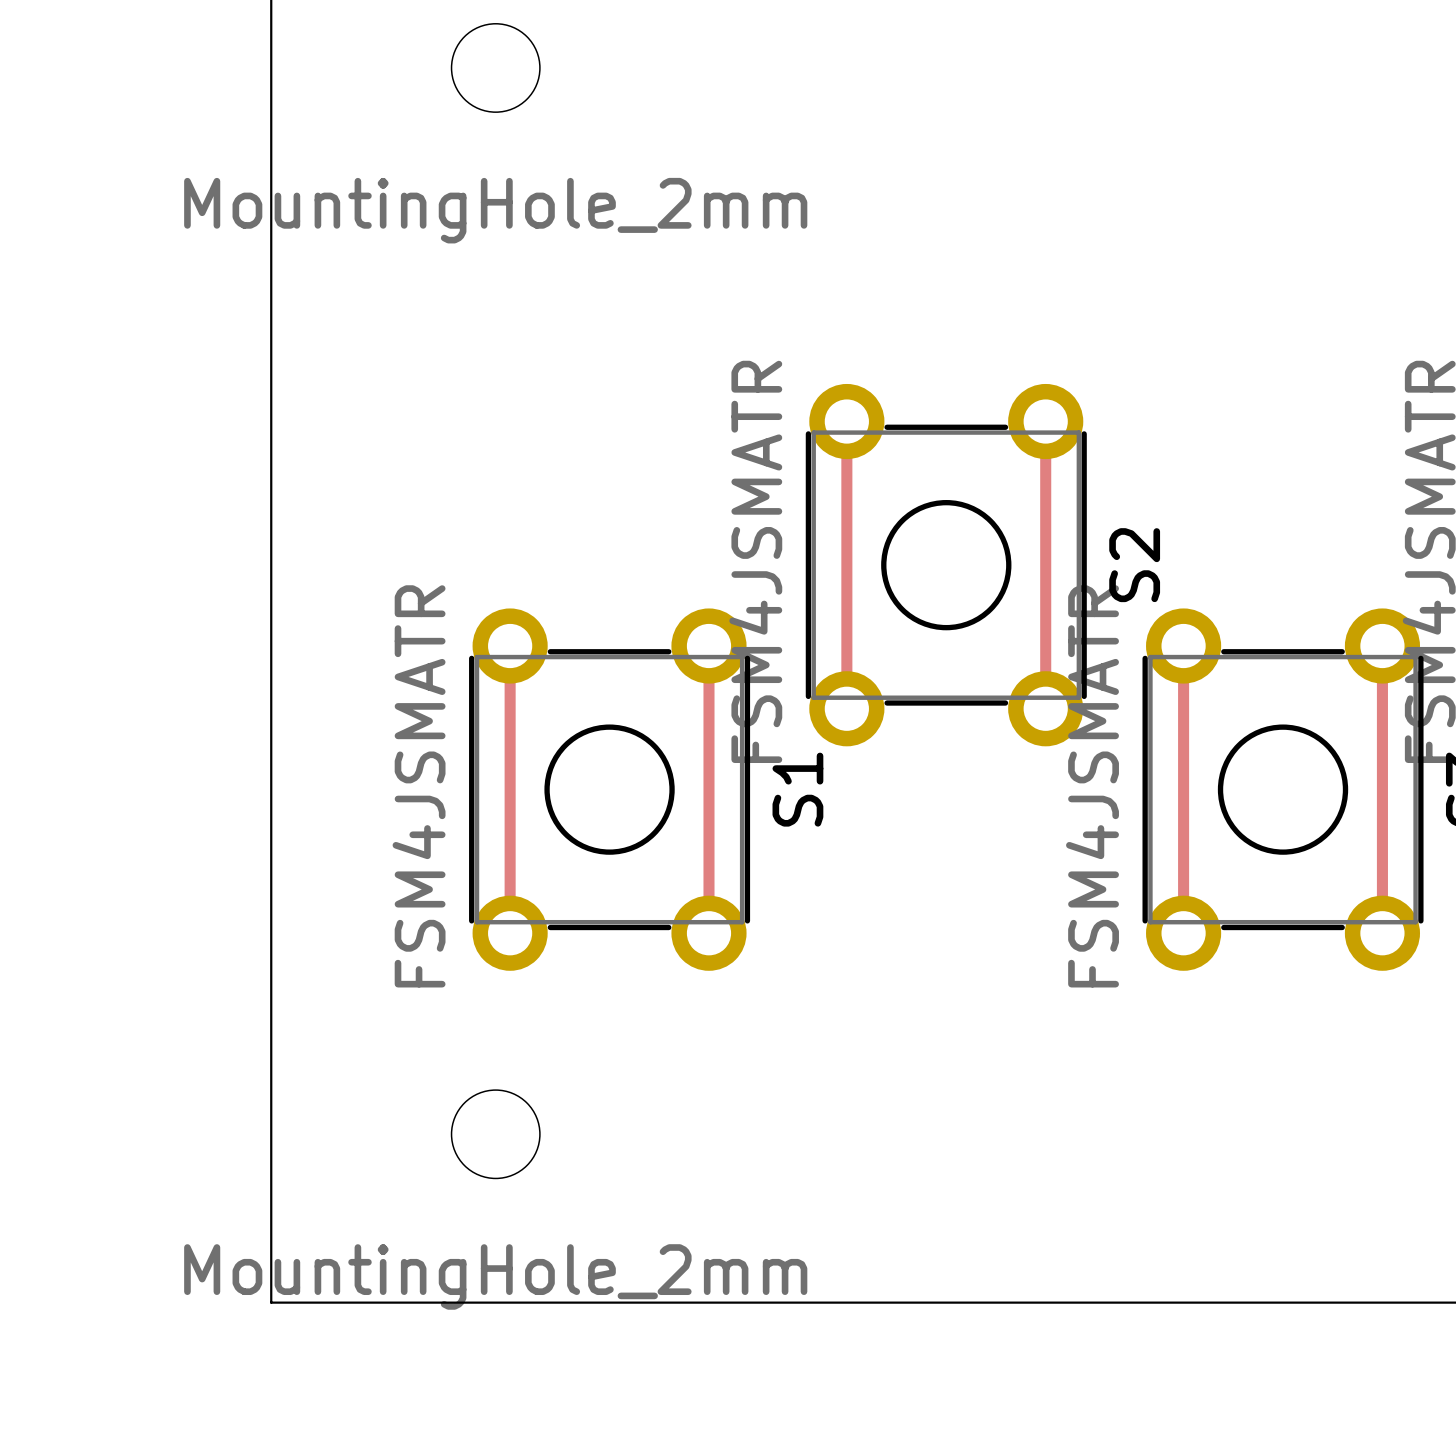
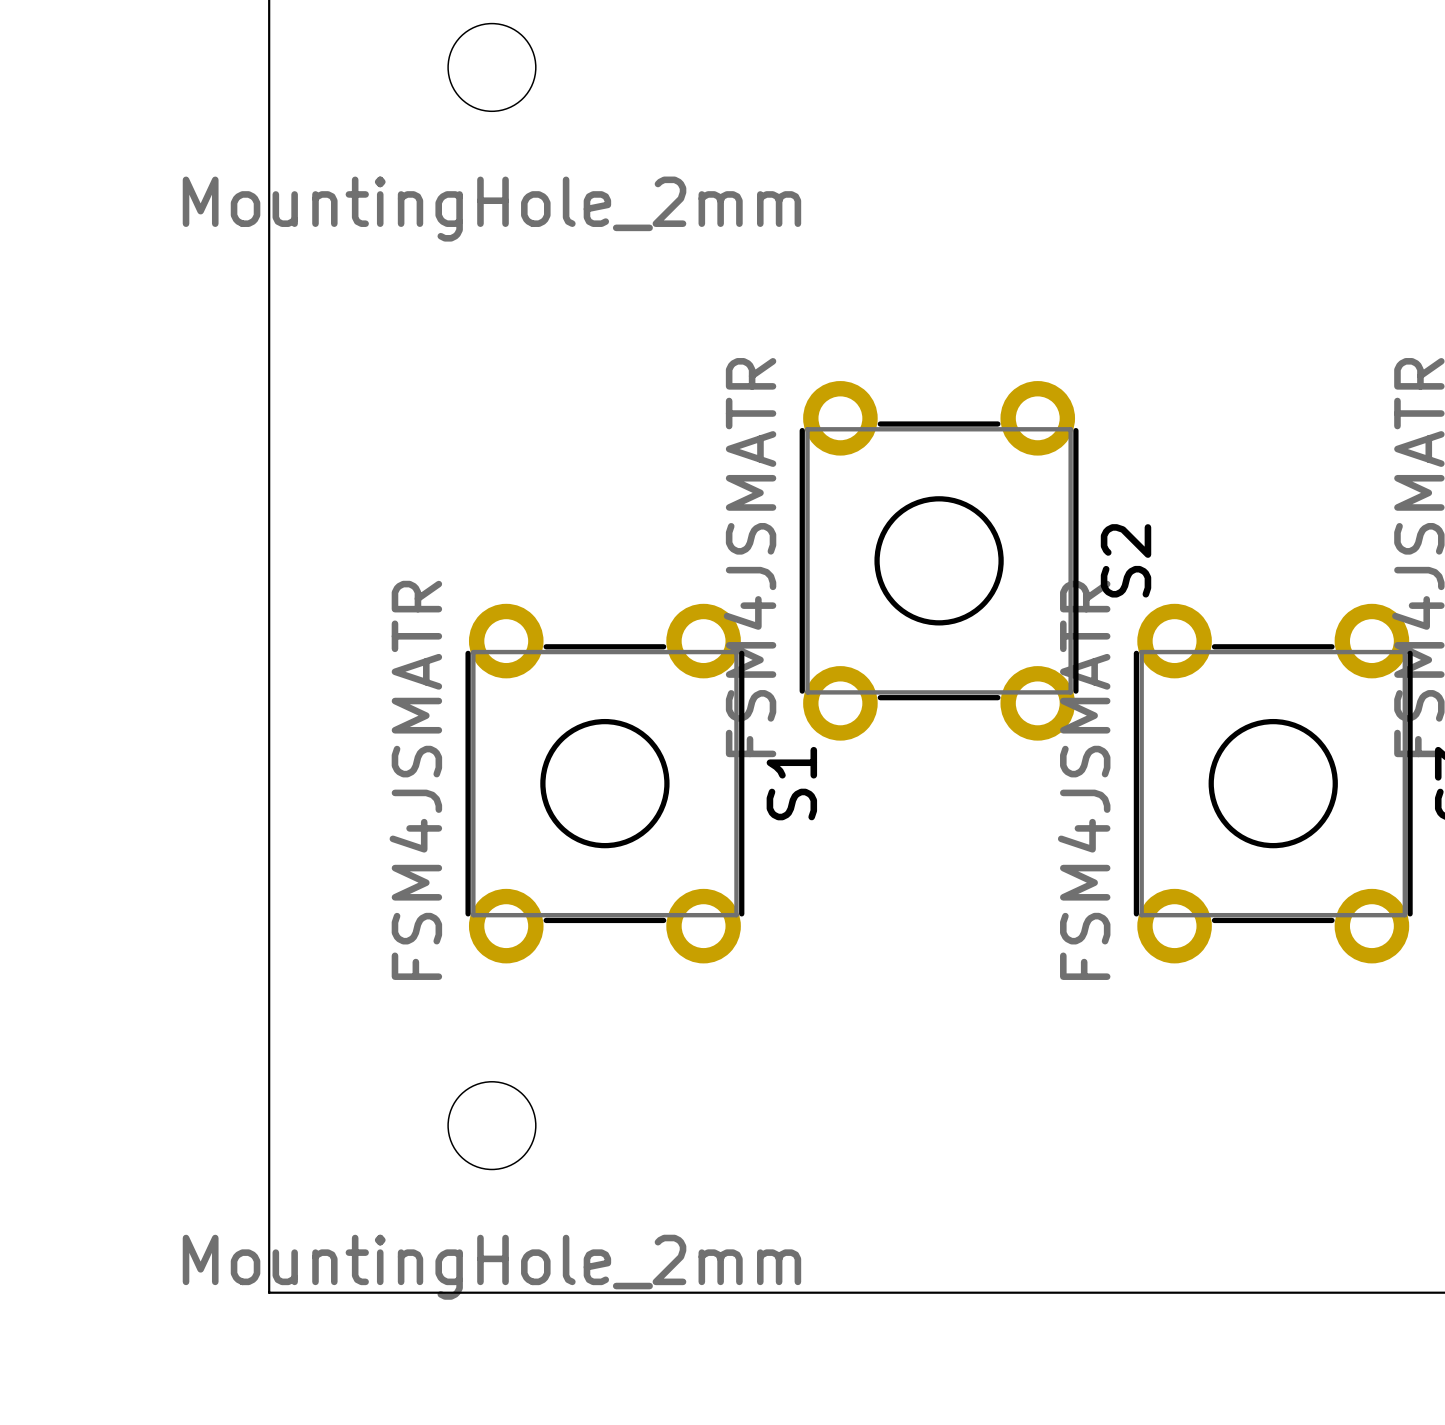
track: (846, 421) (846, 708) -> none
track: (1045, 421) (1045, 708) -> none
track: (510, 646) (510, 933) -> none
track: (708, 646) (708, 933) -> none
track: (1183, 646) (1183, 933) -> none
track: (1382, 646) (1382, 933) -> none

